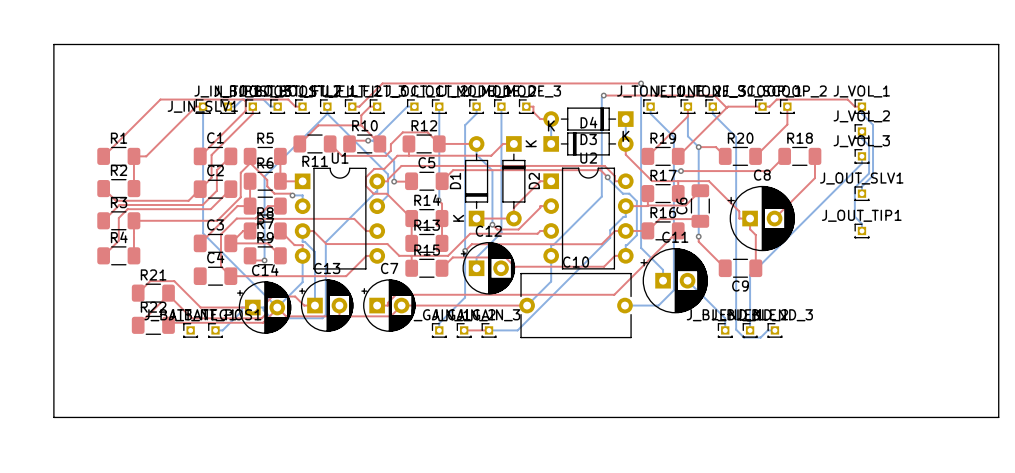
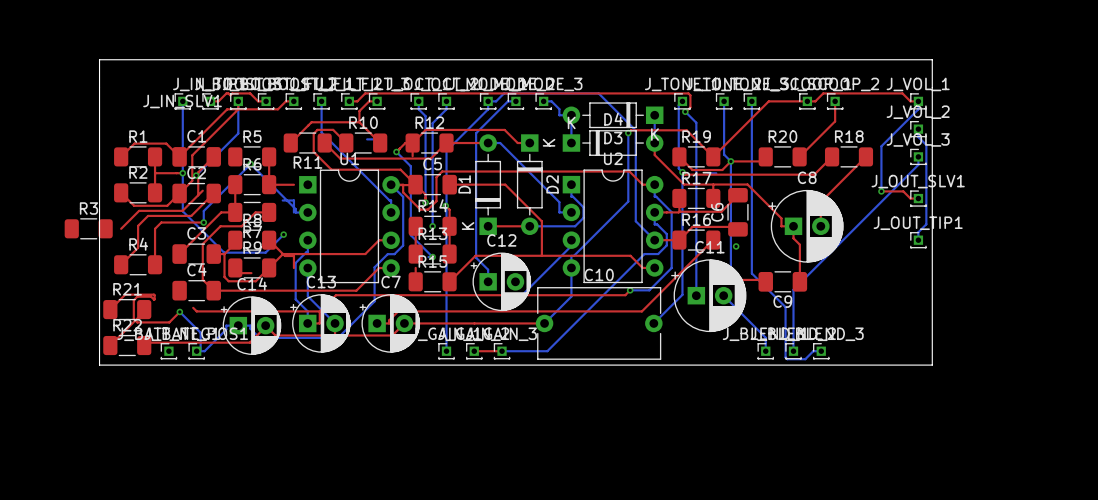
board edge: (53, 44) (53, 417) (998, 417) (998, 44) (53, 44) -> (99, 59) (99, 365) (932, 365) (932, 59) (99, 59)
top track: (641, 83) (382, 83) (366, 99) -> (685, 111) (690, 107) (690, 95) (688, 93) (365, 93)
bottom track: (641, 83) (641, 247) (663, 269) -> (685, 111) (696, 122) (696, 283)
via: (641, 83) -> none
top track: (603, 95) (714, 95) (726, 107) -> none
bottom track: (603, 95) (601, 97) (601, 196) -> (628, 133) (627, 201)
via: (603, 95) -> none
top track: (242, 99) (160, 99) (103, 156) -> (226, 93) (218, 101) (210, 101)
top track: (263, 99) (288, 99) (295, 106) -> (250, 93) (258, 101) (266, 101)
top track: (245, 101) (245, 110) (242, 113) -> (285, 101) (277, 109) (227, 109)
top track: (203, 106) (195, 106) (146, 156) (133, 156) (133, 188) -> none
bottom track: (227, 106) (235, 106) (242, 99) (263, 99) (270, 106) (277, 106) -> none
bottom track: none -> (238, 101) (238, 133) (196, 175)
bottom track: (414, 106) (407, 106) (373, 140) (394, 161) (394, 181) -> (418, 101) (418, 109) (425, 116) (425, 202)
bottom track: none -> (488, 101) (496, 101) (504, 93) (598, 93) (635, 130) (635, 221) (654, 240)
bottom track: (501, 106) (501, 232) (476, 257) -> (515, 101) (507, 101) (476, 133) (476, 257) (488, 269)
top track: (526, 106) (533, 106) (533, 112) (540, 119) (551, 119) -> none
bottom track: none -> (543, 101) (551, 101) (559, 109) (559, 115) (571, 115)
bottom track: (650, 106) (650, 113) (673, 137) (673, 290) (658, 305) (624, 305) -> (682, 101) (678, 105) (678, 168) (682, 172) (682, 294) (653, 323)
top track: (687, 106) (687, 116) (647, 156) -> none
bottom track: none -> (321, 109) (321, 132) (391, 200) (391, 212)
bottom track: (439, 113) (439, 151) -> (475, 122) (446, 150)
bottom track: none -> (446, 109) (432, 123) (432, 226)
bottom track: (712, 113) (736, 137) (736, 329) (744, 337) -> (751, 109) (751, 273) (785, 307) (785, 357) (787, 359)
bottom track: (861, 113) (873, 124) (873, 175) (861, 186) (861, 193) -> (918, 109) (881, 146) (881, 191)
via: none -> (685, 111)
bottom track: (465, 125) (465, 297) (439, 323) -> (446, 205) (446, 343)
top track: none -> (628, 133) (631, 130) (686, 130) (713, 156)
via: none -> (628, 133)
bottom track: (687, 136) (698, 147) (698, 236) -> (724, 134) (724, 154) (730, 161) (732, 279)
top track: (368, 140) (352, 140) (349, 143) -> (425, 202) (425, 194) (400, 169) (331, 169) (313, 151) (313, 133) (317, 129) (333, 129) (346, 143)
via: (368, 140) -> none
top track: (439, 143) (427, 132) (402, 132) (390, 144) (390, 150) (385, 155) (342, 155) -> (446, 143) (430, 158) (340, 158) (337, 156)
bottom track: (476, 143) (476, 154) (492, 170) (492, 224) -> (488, 143) (500, 143) (559, 202) (559, 212) (571, 212)
top track: (503, 143) (491, 155) (397, 155) (384, 168) (374, 168) (366, 177) (366, 186) (373, 193) (386, 193) (411, 218) -> (517, 143) (504, 129) (425, 129) (412, 143) (405, 143) (396, 151)
top track: (698, 147) (715, 147) (725, 156) -> (679, 156) (692, 170) (722, 170) (730, 161) (761, 161) (765, 156)
via: (698, 147) -> none
bottom track: none -> (399, 148) (396, 151) (410, 166) (410, 235) (432, 257) (428, 257)
via: none -> (396, 151)
R1 position: (118, 156) -> (138, 156)
top track: none -> (121, 156) (134, 143) (166, 143) (179, 156)
top track: none -> (155, 156) (155, 192)
top track: (814, 156) (814, 178) (774, 218) -> (865, 156) (820, 202) (820, 226)
via: none -> (730, 161)
via: none -> (250, 164)
top track: none -> (155, 173) (182, 173)
via: none -> (182, 173)
via: none -> (682, 172)
top track: (680, 171) (769, 171) -> (682, 172) (684, 174) (815, 173)
via: (680, 171) -> none
via: none -> (196, 175)
bottom track: (869, 173) (854, 187) (854, 216) (861, 223) -> (926, 175) (926, 224) (918, 232)
top track: (607, 177) (600, 170) (453, 170) (442, 181) -> (541, 255) (541, 221) (505, 184) (449, 184)
bottom track: (607, 177) (622, 193) (629, 193) (636, 201) (636, 235) (625, 245) (625, 255) -> none
via: (607, 177) -> none
bottom track: (377, 181) (377, 192) (325, 242) (325, 314) (322, 318) (271, 318) -> (391, 184) (403, 196) (403, 245) (394, 254) (387, 254) (374, 267) (374, 301) (338, 337) (259, 337)
via: (394, 181) -> none
top track: (551, 181) (540, 181) (513, 207) (513, 218) -> none
bottom track: none -> (571, 184) (571, 196) (583, 207) (583, 217) (575, 226) (529, 226)
top track: (614, 181) (614, 176) (604, 165) (401, 165) (388, 181) (377, 181) -> (642, 184) (629, 171) (442, 171) (436, 177) (436, 201) (428, 209) (420, 209) (403, 192) (403, 184) (391, 184)
bottom track: none -> (654, 184) (654, 196) (671, 212) (671, 268) (649, 290) (630, 290)
top track: none -> (881, 191) (903, 191) (910, 198) (918, 198)
via: none -> (881, 191)
top track: (103, 188) (115, 200) (189, 200) -> (121, 192) (134, 205) (167, 205)
R2 position: (118, 188) -> (138, 192)
top track: (292, 195) (290, 193) (274, 193) (267, 186) (267, 180) (250, 163) (240, 172) (240, 197) (217, 220) (133, 220) (133, 255) -> none
via: (292, 195) -> none
via: none -> (425, 202)
top track: (202, 204) (119, 204) (103, 220) -> (182, 210) (139, 210) (121, 228)
bottom track: (203, 205) (203, 233) (277, 307) (302, 282) (302, 255) -> (182, 211) (224, 252) (265, 252) (283, 234)
bottom track: none -> (307, 212) (295, 212) (295, 209) (250, 164) (203, 211) (203, 222)
bottom track: (377, 206) (388, 195) (388, 174) (327, 113) (264, 176) (264, 260) -> none
top track: (551, 206) (540, 206) (518, 229) (497, 229) (492, 224) -> none
top track: (171, 209) (127, 209) (118, 218) (118, 240) (103, 255) -> (148, 215) (138, 225) (138, 247) (121, 264)
top track: none -> (203, 222) (161, 222) (155, 228) (155, 264)
via: none -> (203, 222)
bottom track: (625, 216) (610, 230) (610, 237) (517, 330) -> (654, 224) (657, 224) (666, 234) (666, 245) (658, 254) (644, 254) (547, 351) (533, 351)
U1 position: (339, 218) -> (349, 226)
via: none -> (432, 226)
via: (492, 224) -> none
via: none -> (283, 234)
top track: none -> (235, 240) (235, 243) (224, 254) (224, 277) (228, 281) (255, 281) (283, 254) (365, 254) (379, 240) (391, 240)
top track: (551, 230) (540, 230) (537, 233) (470, 233) (448, 255) (399, 255) (387, 244) (326, 244) (313, 231) (302, 231) -> none
bottom track: none -> (571, 240) (571, 245) (520, 296)
top track: (625, 230) (614, 230) (601, 244) (471, 244) (465, 250) -> none
bottom track: (302, 231) (302, 241) (314, 251) (314, 294) -> (307, 240) (307, 252) (295, 262) (295, 299) (307, 311)
top track: (377, 231) (366, 231) (354, 218) (262, 218) (250, 230) (243, 230) (230, 243) -> none
top track: (698, 236) (698, 241) (723, 266) -> (732, 279) (763, 279)
top track: (240, 243) (267, 243) (280, 255) -> none
via: none -> (432, 257)
via: (465, 250) -> none
R4 position: (118, 255) -> (138, 264)
bottom track: none -> (307, 268) (307, 296) (335, 323)
top track: (377, 255) (366, 255) (346, 276) -> (391, 268) (379, 268) (356, 290) (342, 290)
top track: (614, 255) (604, 266) (514, 266) (505, 257) (452, 257) -> (642, 267) (630, 255) (475, 255) (461, 269)
via: (264, 260) -> none
top track: none -> (630, 290) (625, 295) (335, 295) (319, 311)
via: none -> (630, 290)
top track: (150, 281) (174, 281) (200, 307) (252, 307) -> (123, 296) (125, 294) (154, 295) (154, 299) (151, 296) (137, 296) (133, 300) (133, 318) (137, 322) (169, 322) (179, 311)
top track: none -> (193, 307) (196, 311) (319, 311)
top track: (168, 294) (191, 318) (261, 318) (265, 314) (265, 303) (272, 296) (295, 296) (304, 305) (314, 305) -> (319, 311) (319, 323) (307, 323)
bottom track: none -> (179, 311) (200, 332) (200, 351)
via: none -> (179, 311)

